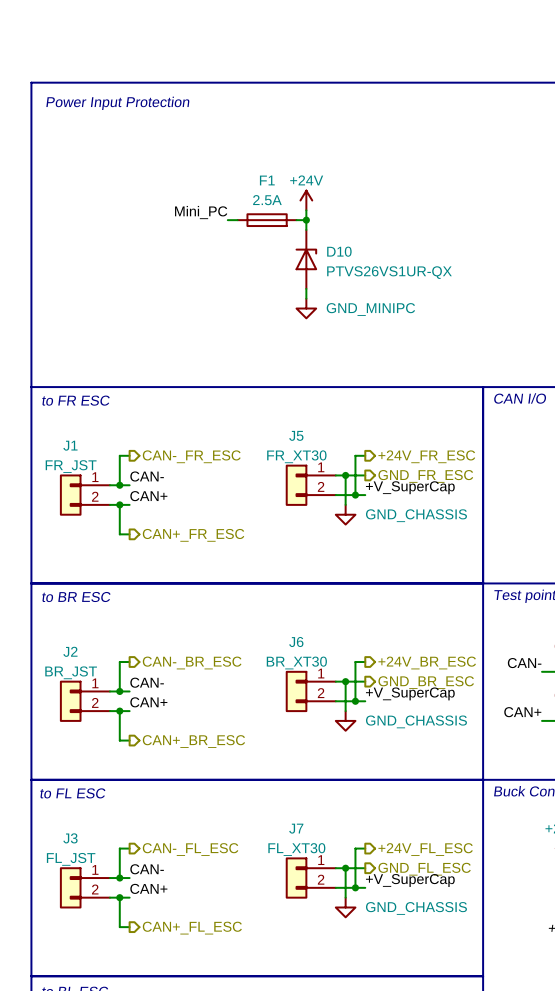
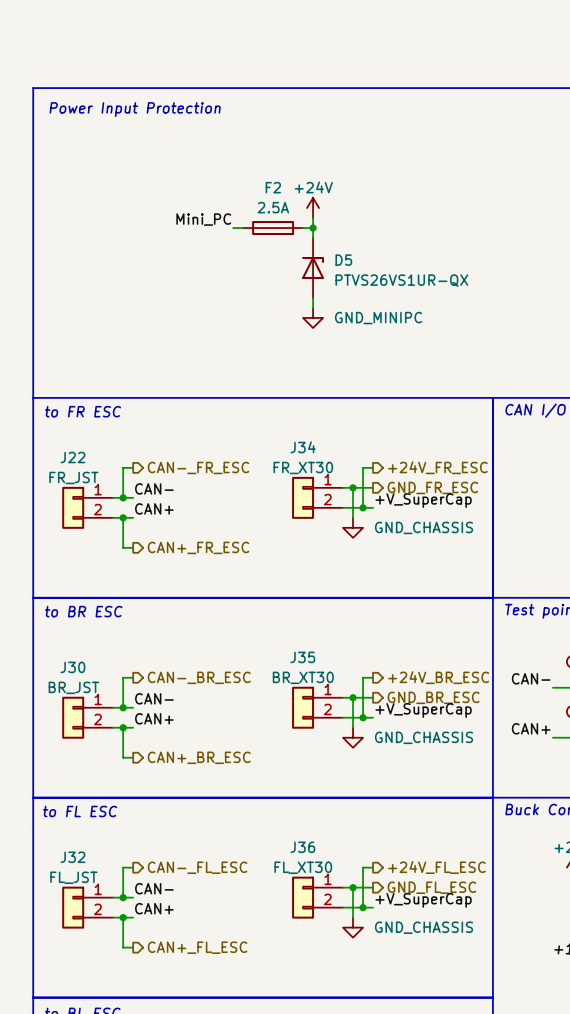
F1 name: F1 (267, 180) -> F2 (273, 187)
D10 name: D10 (339, 251) -> D5 (343, 260)
J5 name: J5 (296, 435) -> J34 (303, 447)
J1 name: J1 (70, 445) -> J22 (72, 457)
J6 name: J6 (296, 642) -> J35 (302, 657)
J2 name: J2 (70, 651) -> J30 (72, 667)
J7 name: J7 (296, 828) -> J36 (302, 847)
J3 name: J3 (70, 838) -> J32 (72, 857)

